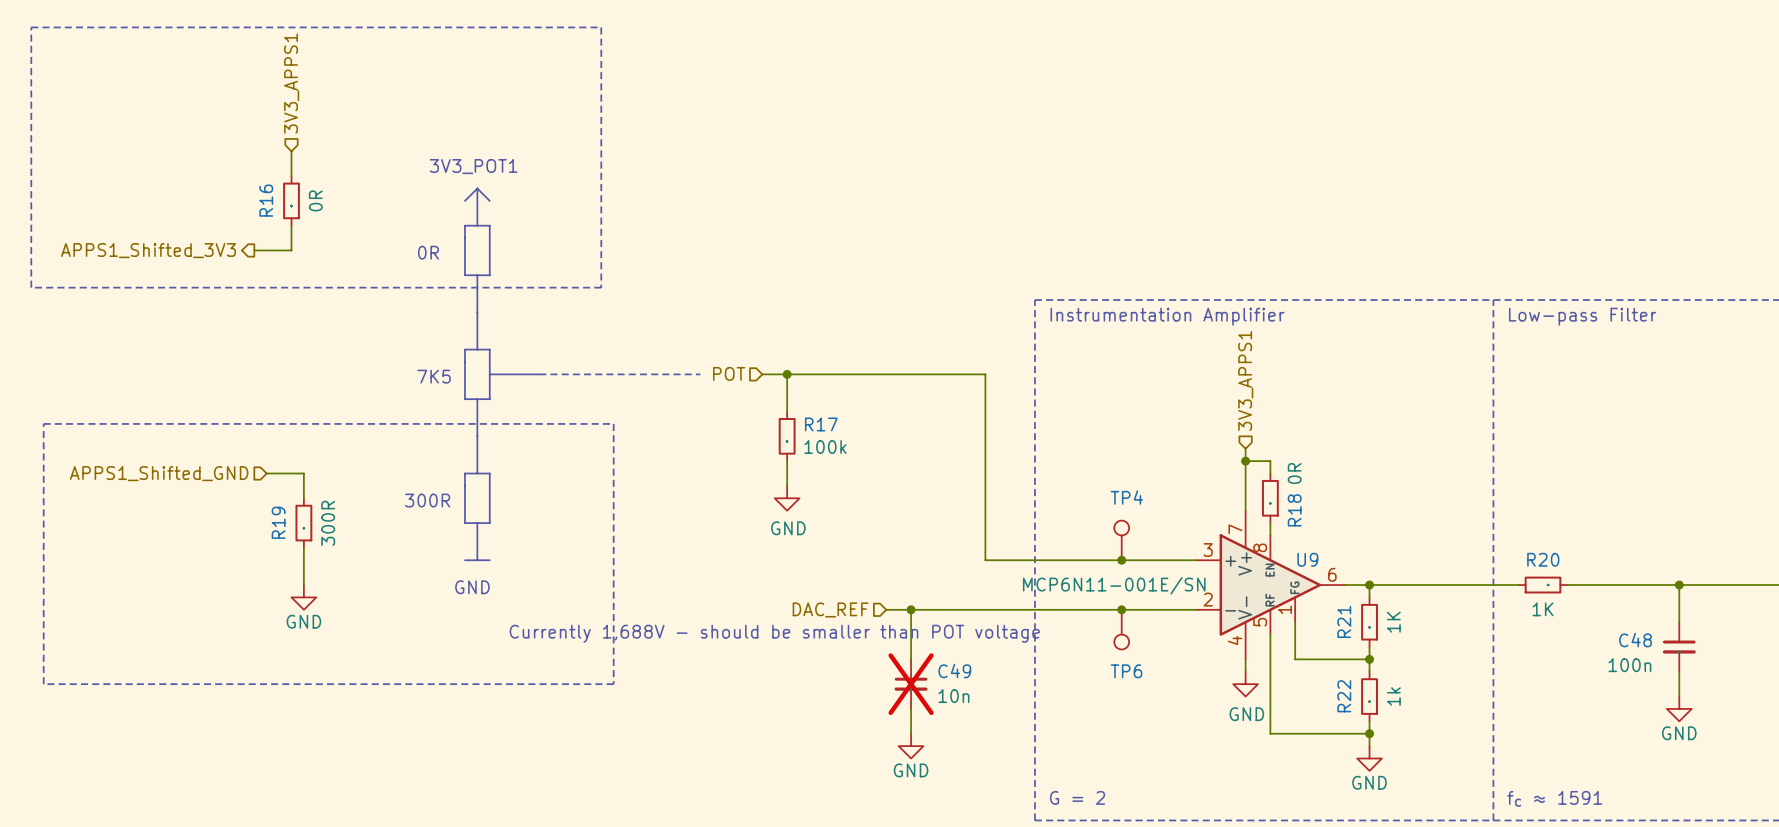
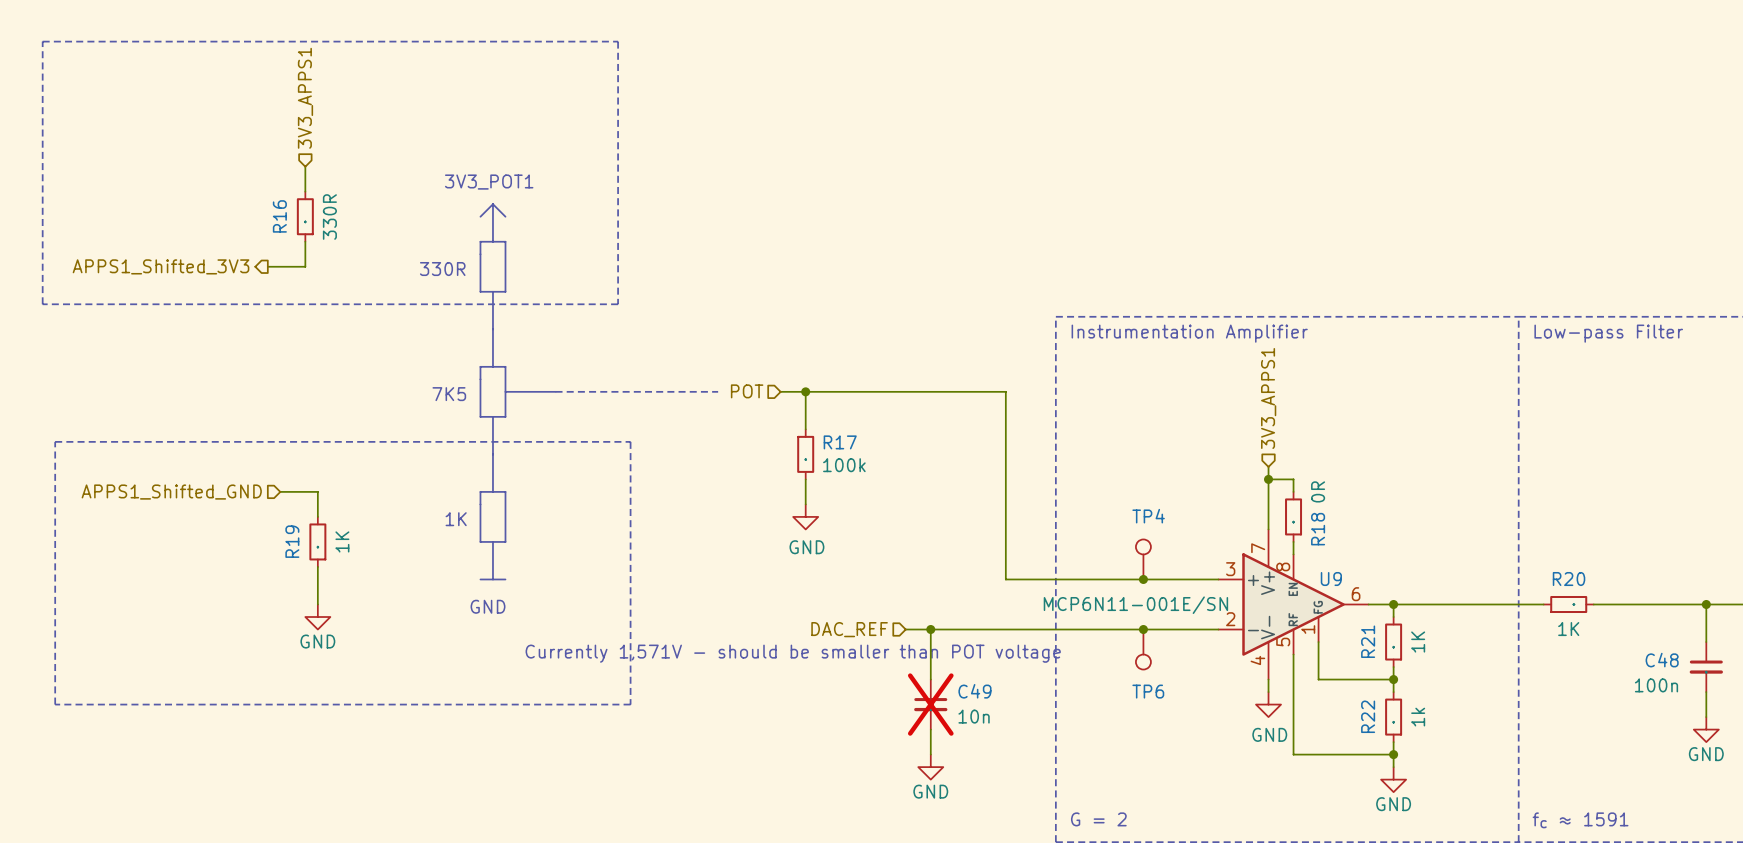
R16 value: 0R (315, 200) -> 330R (329, 217)
text: 0R (428, 252) -> 330R (442, 269)
text: 300R (427, 500) -> none
text: none -> 1K (456, 519)
R19 value: 300R (328, 523) -> 1K (342, 541)
text: Currently 1,688V - should be smaller than POT voltage (774, 633) -> Currently 1,571V - should be smaller than POT voltage (793, 653)

